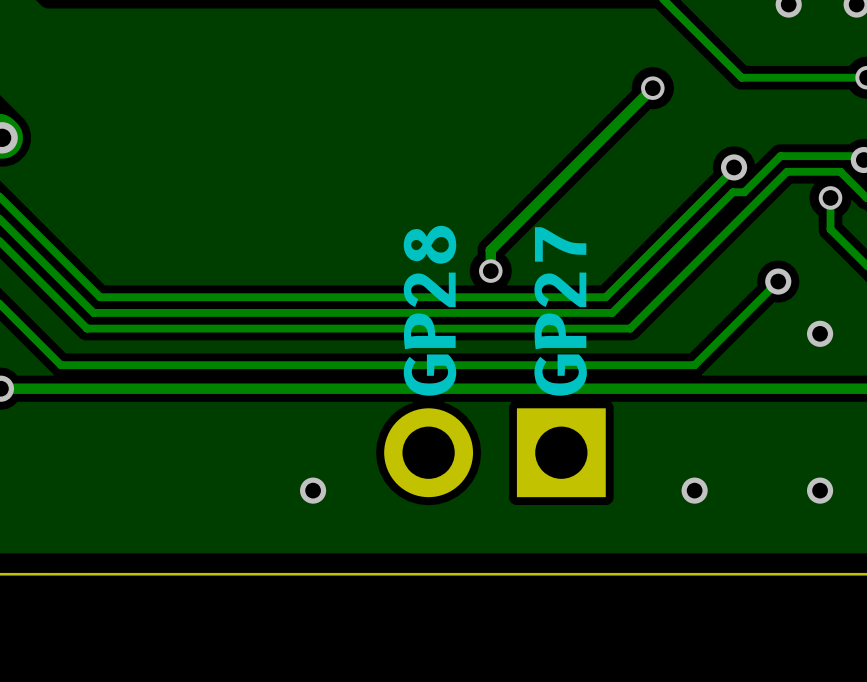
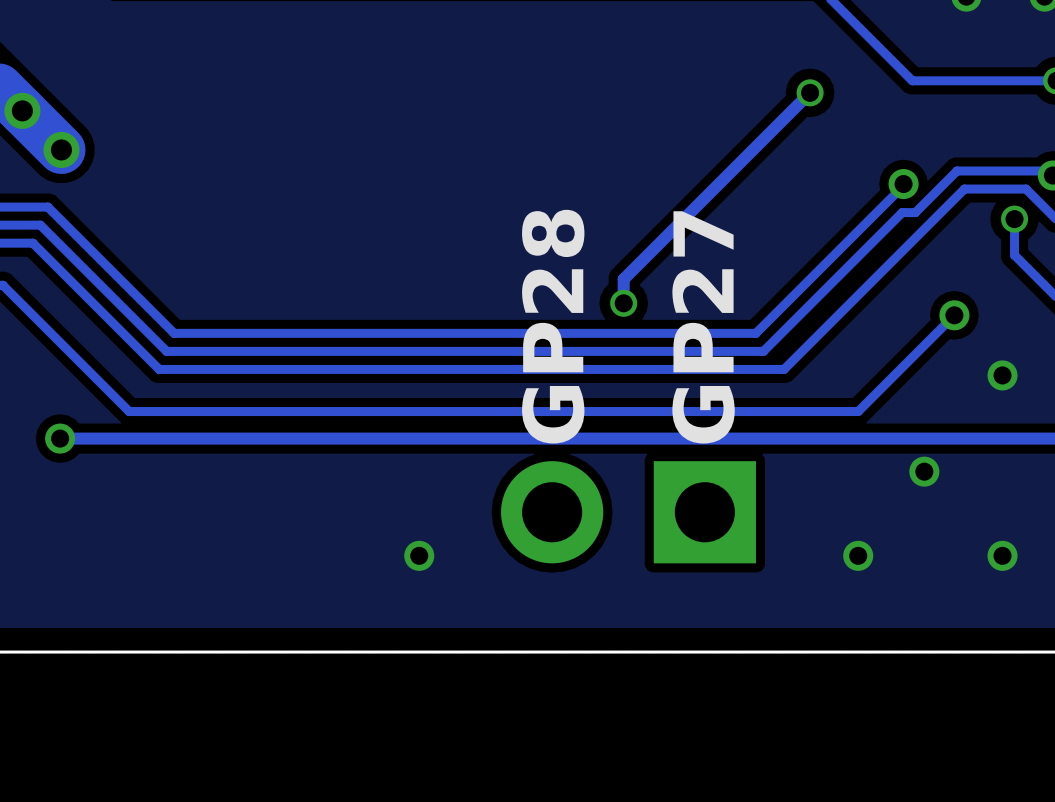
via: none -> (924, 471)

